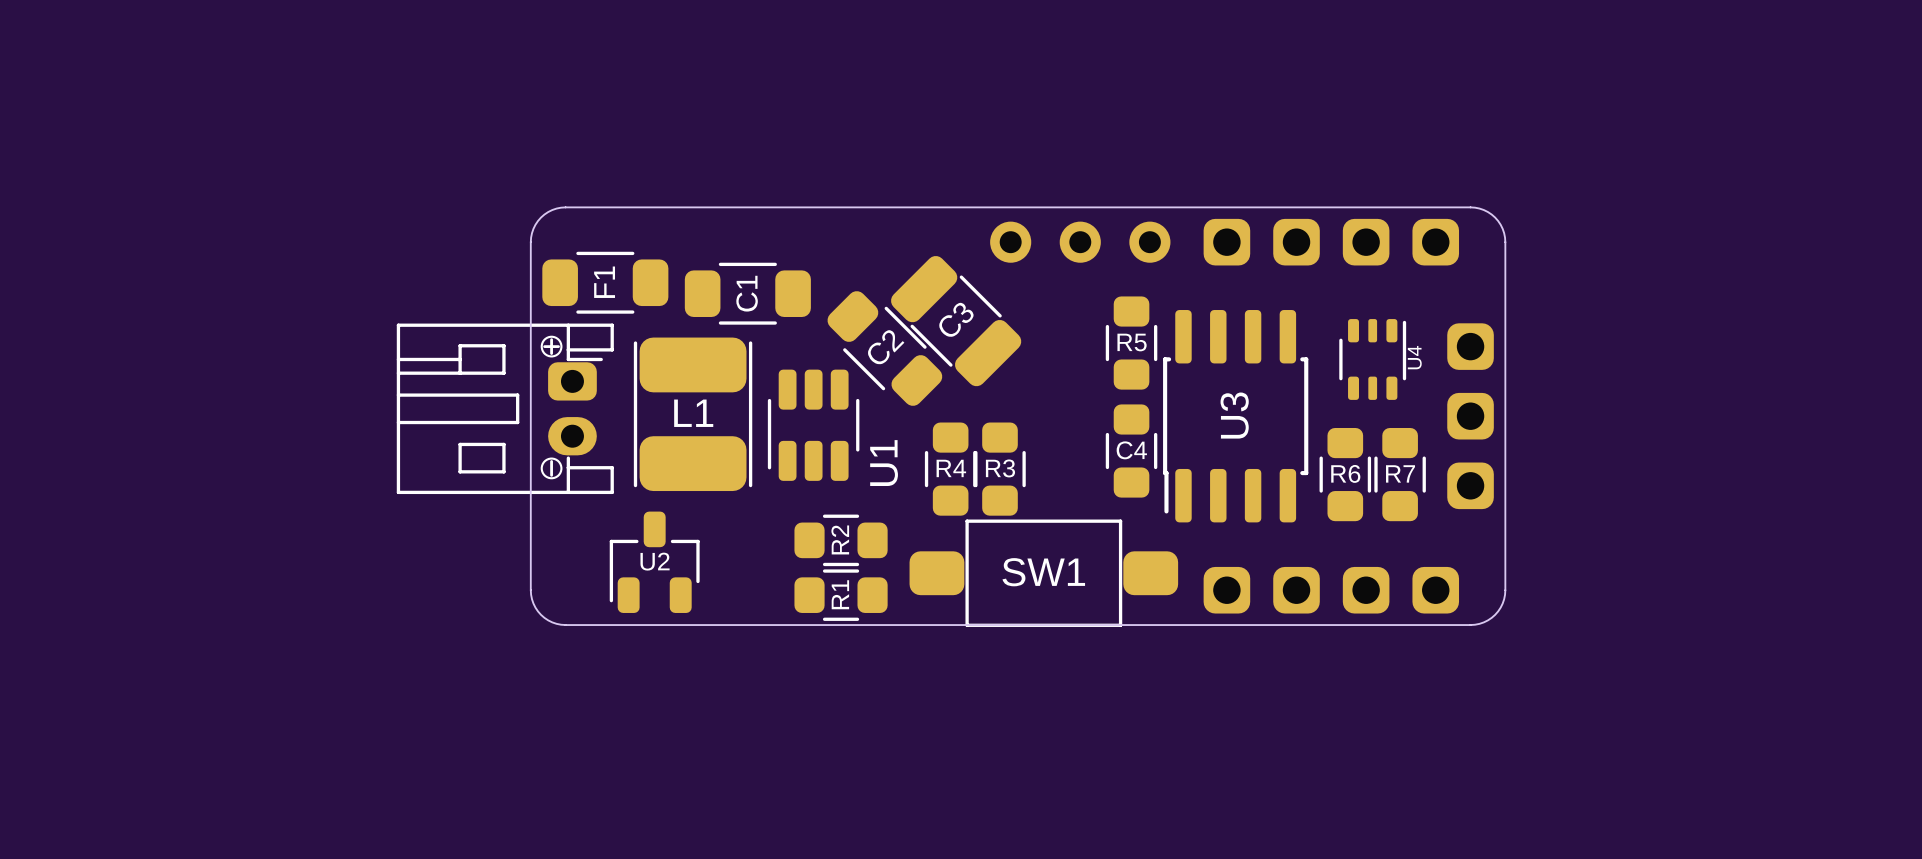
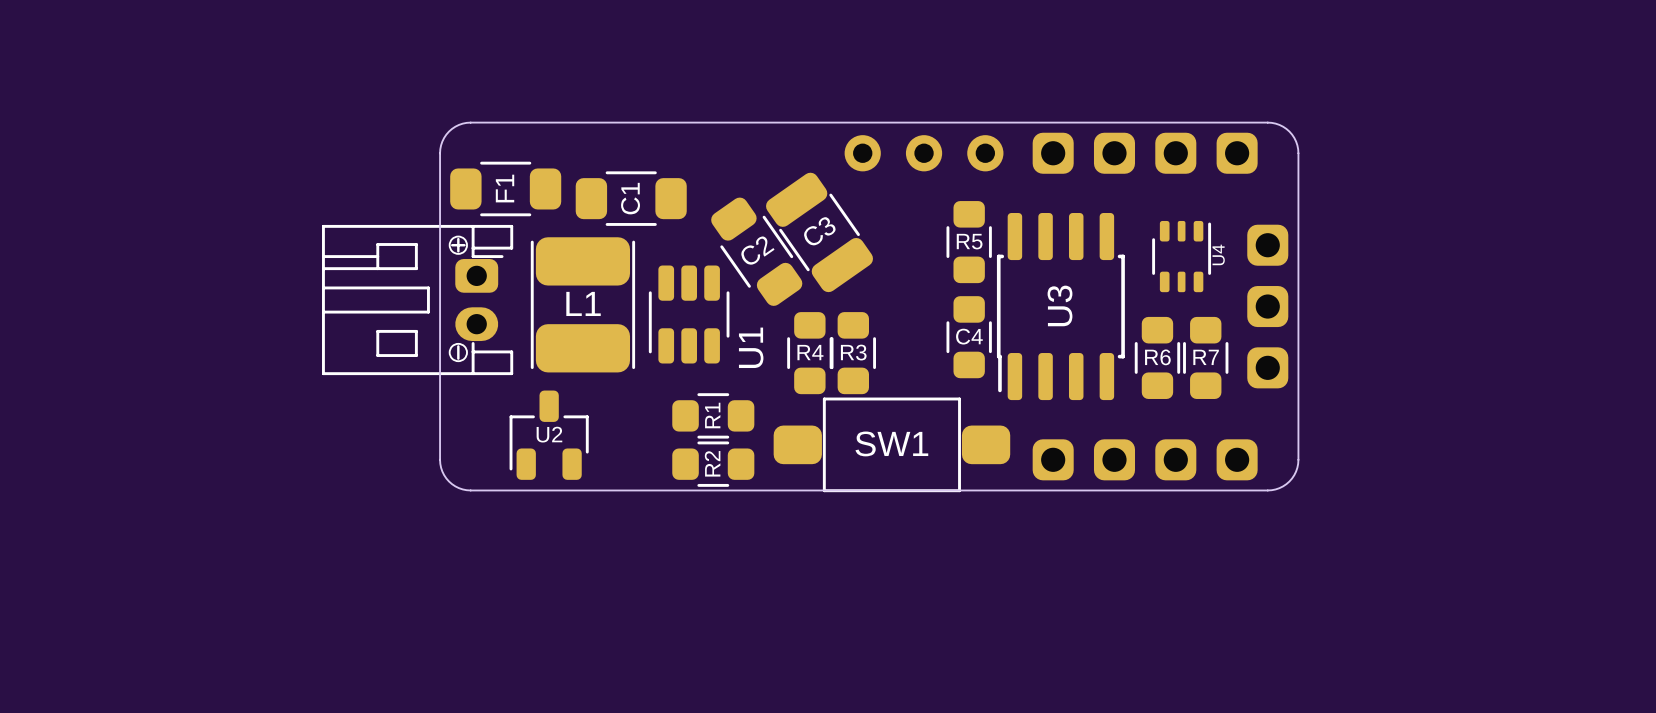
C3 rotation: 0° (956, 321) -> 10° clockwise (819, 232)
C2 rotation: 0° (884, 348) -> 10° clockwise (756, 251)
R2 name: R2 (840, 539) -> R1 (712, 415)
R1 name: R1 (840, 594) -> R2 (712, 463)

